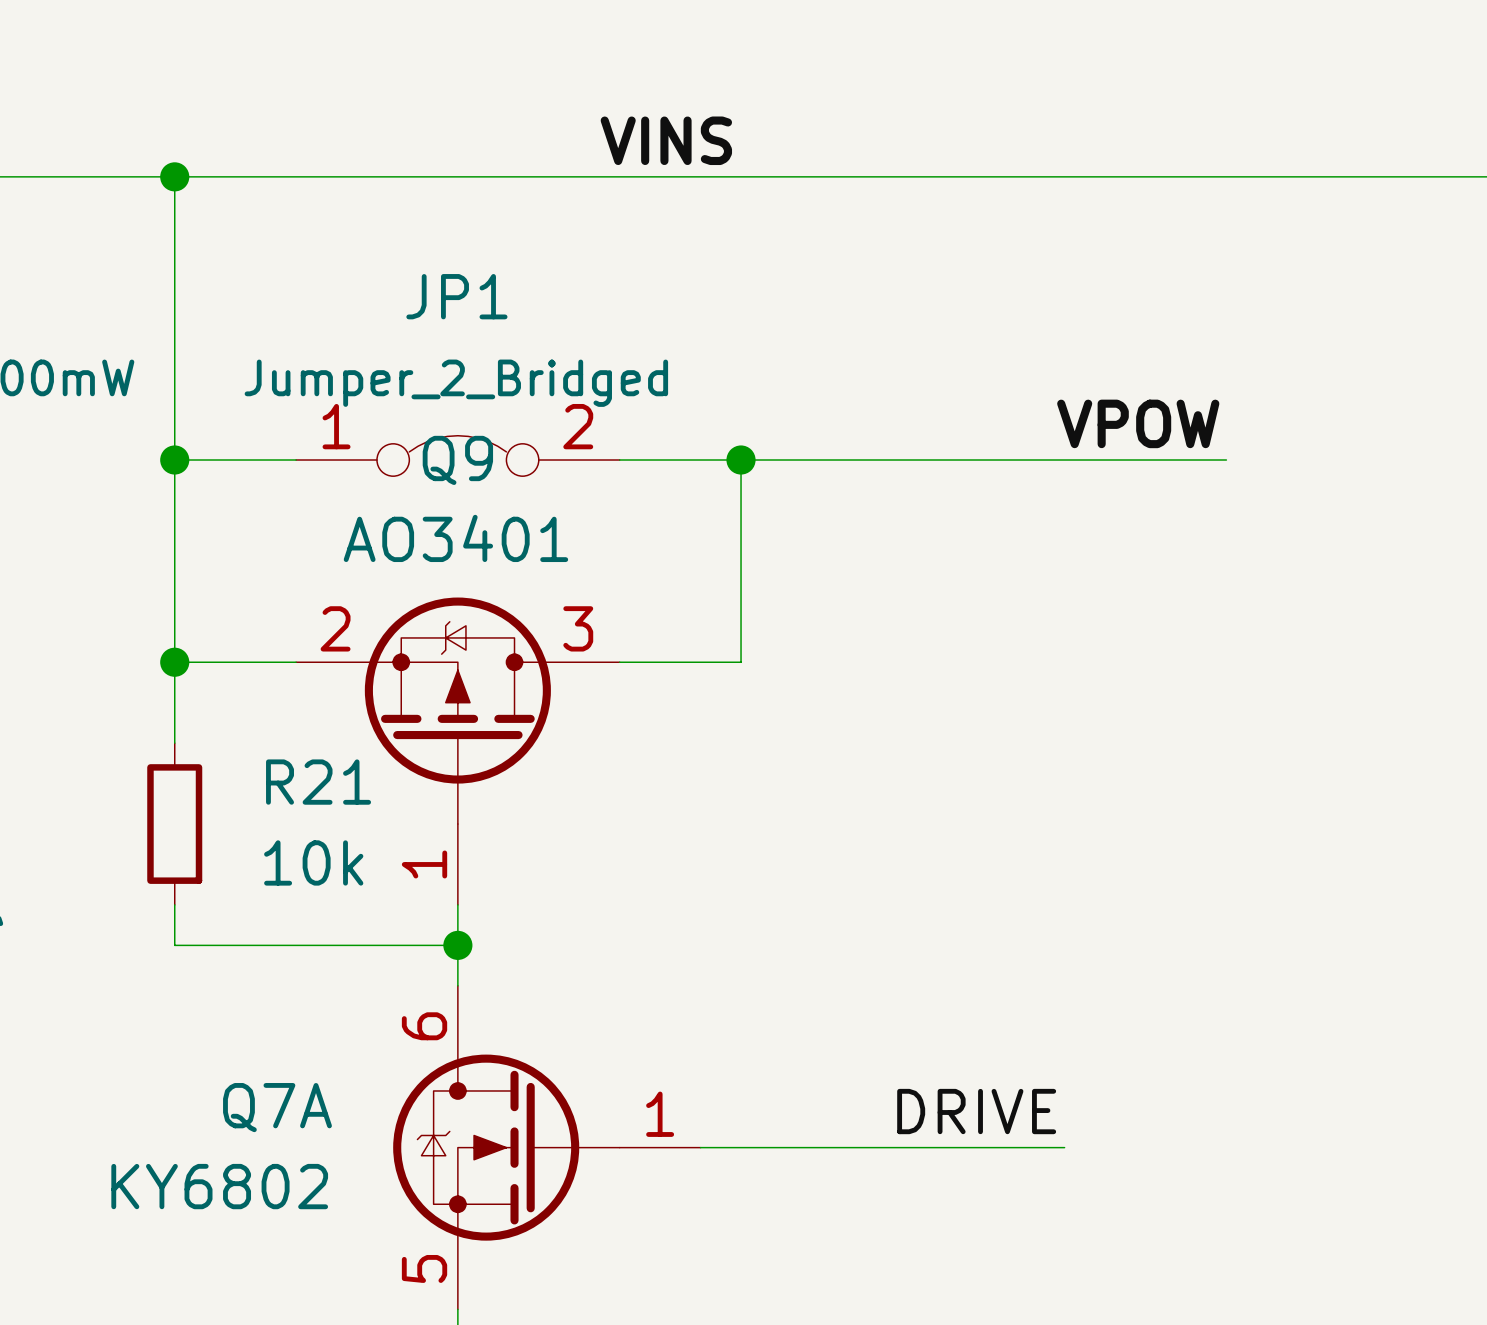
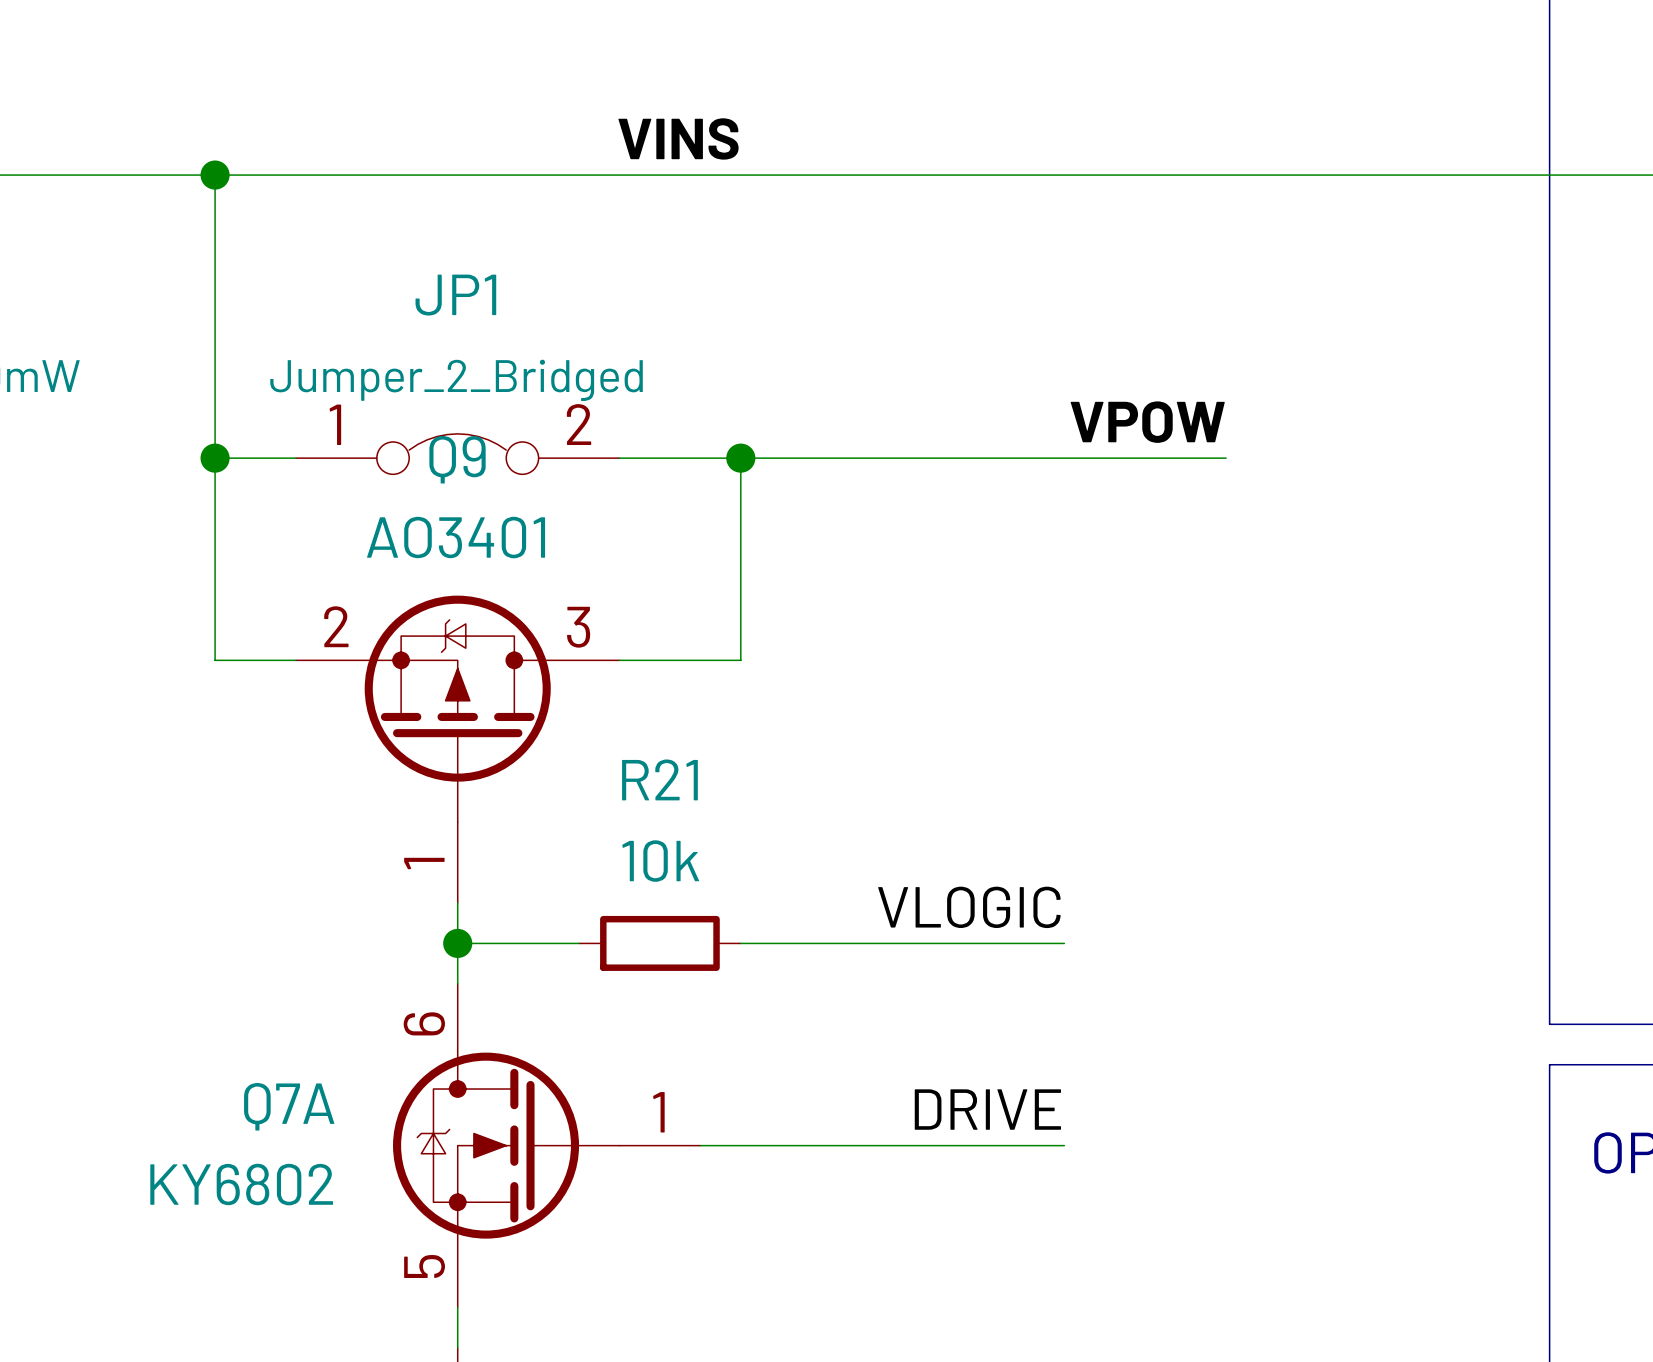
wire: (174, 176) (174, 743) -> none
junction position: (174, 176) -> (215, 175)
wire: (174, 460) (215, 460) -> none
junction position: (174, 460) -> (215, 458)
wire: (174, 662) (215, 662) -> (215, 175) (215, 660)
junction: (174, 662) -> none
R21 name position: R21 (318, 782) -> R21 (659, 779)
R21 rotation: 0° (174, 824) -> 90° clockwise (659, 943)
R21 position: (174, 824) -> (659, 943)
R21 value position: 10k (313, 862) -> 10k (660, 861)
wire: (174, 904) (174, 945) (457, 945) -> (579, 943) (457, 943)
label: none -> VLOGIC (969, 907)
wire: none -> (740, 943) (1064, 943)

